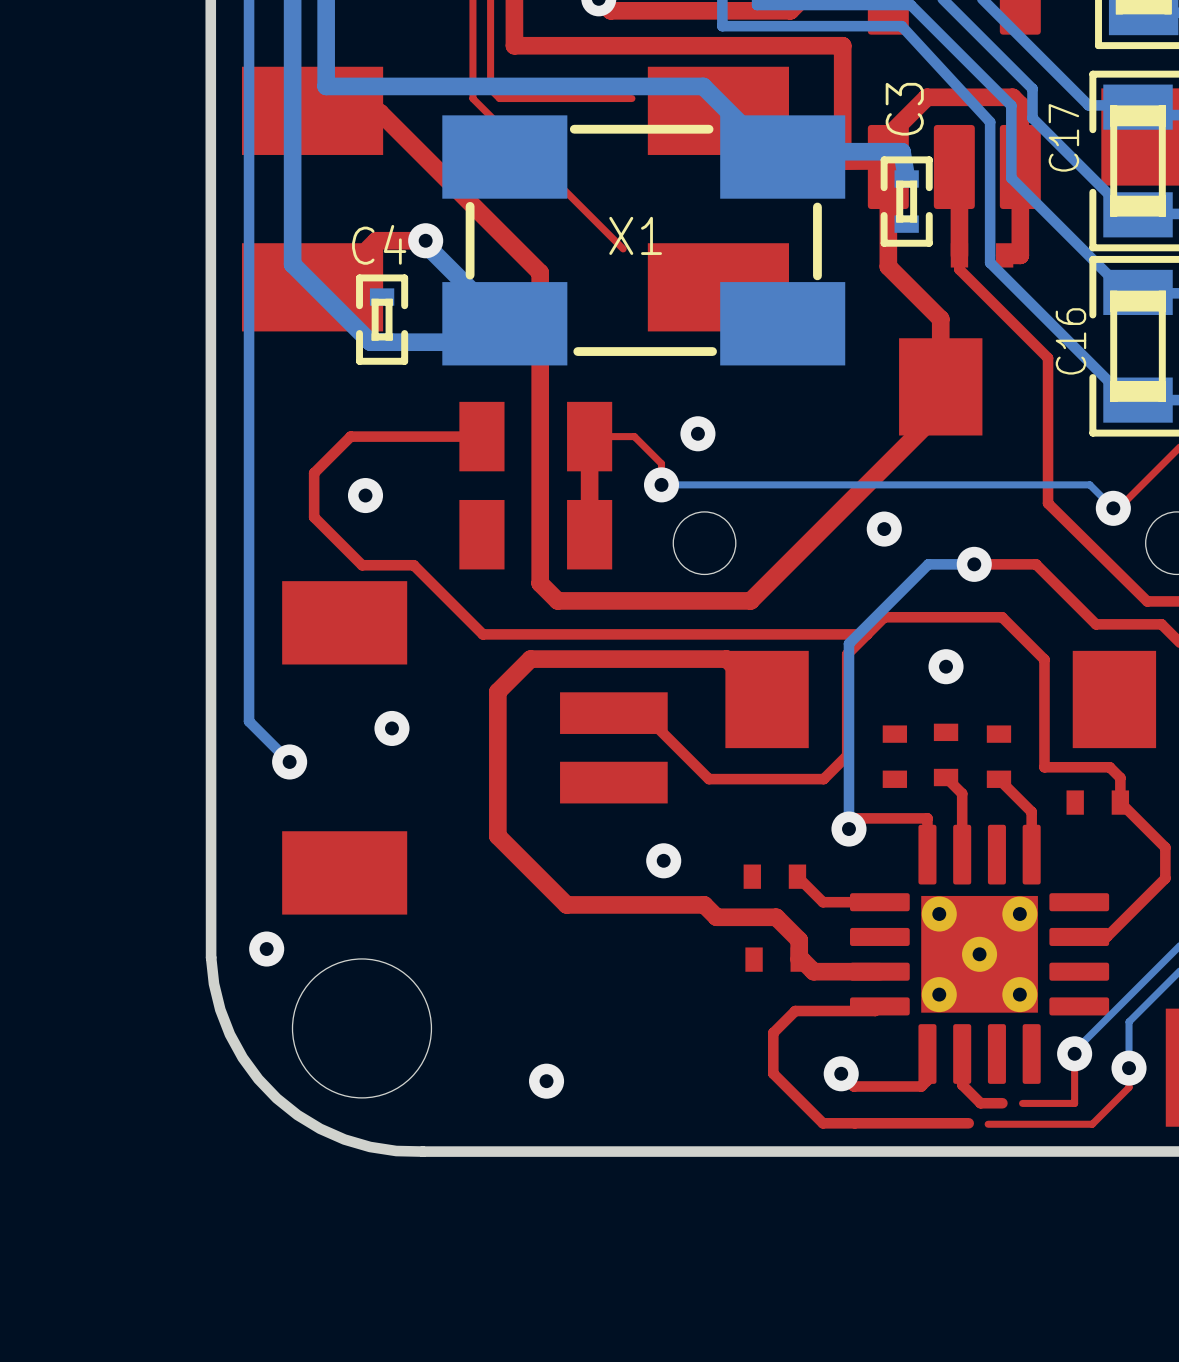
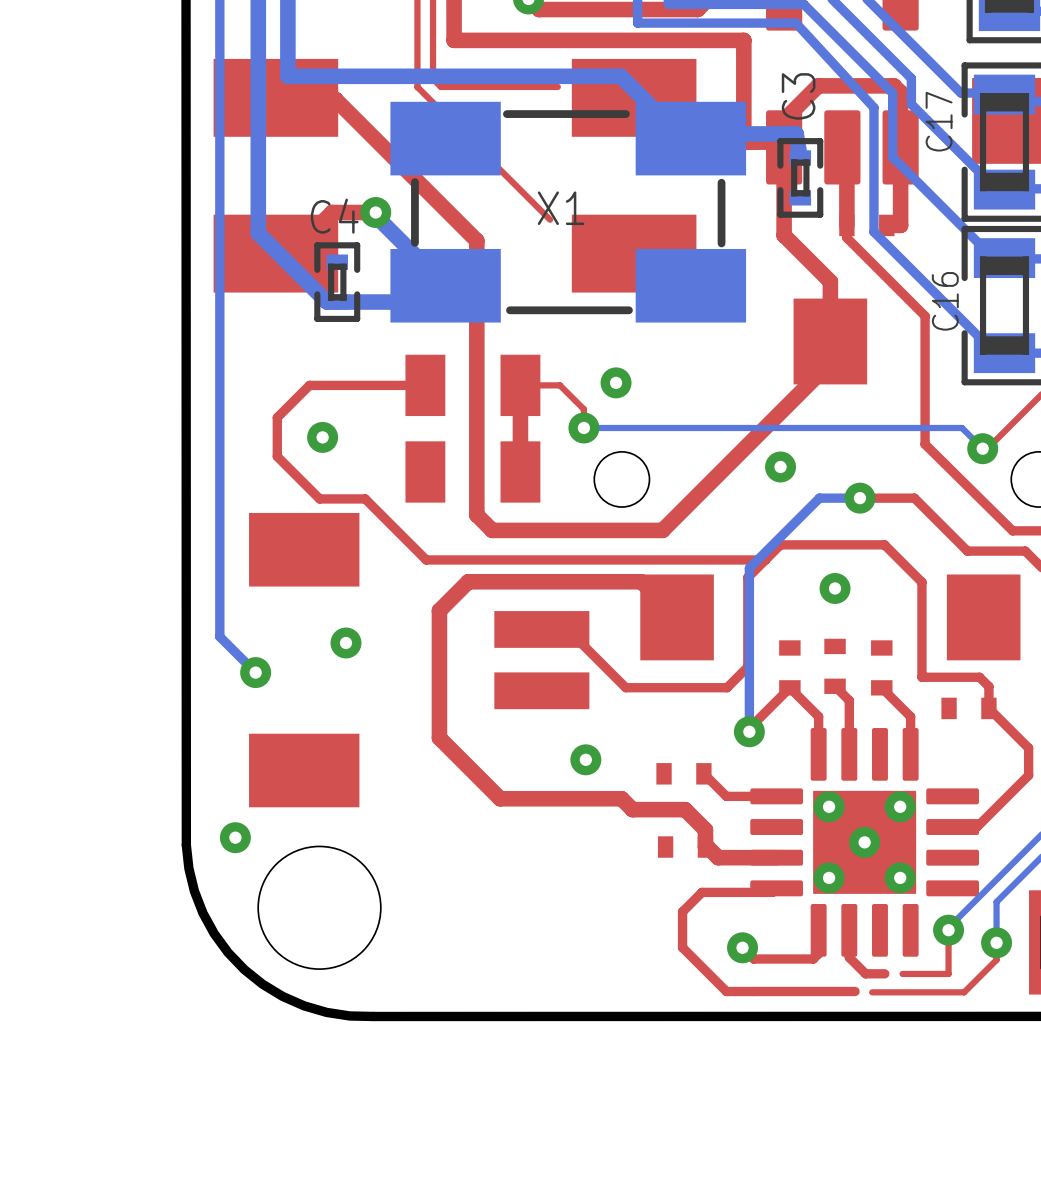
top track: (927, 818) (855, 818) -> (818, 722) (818, 716) (789, 687) (755, 722)
via: (546, 1081) -> none

